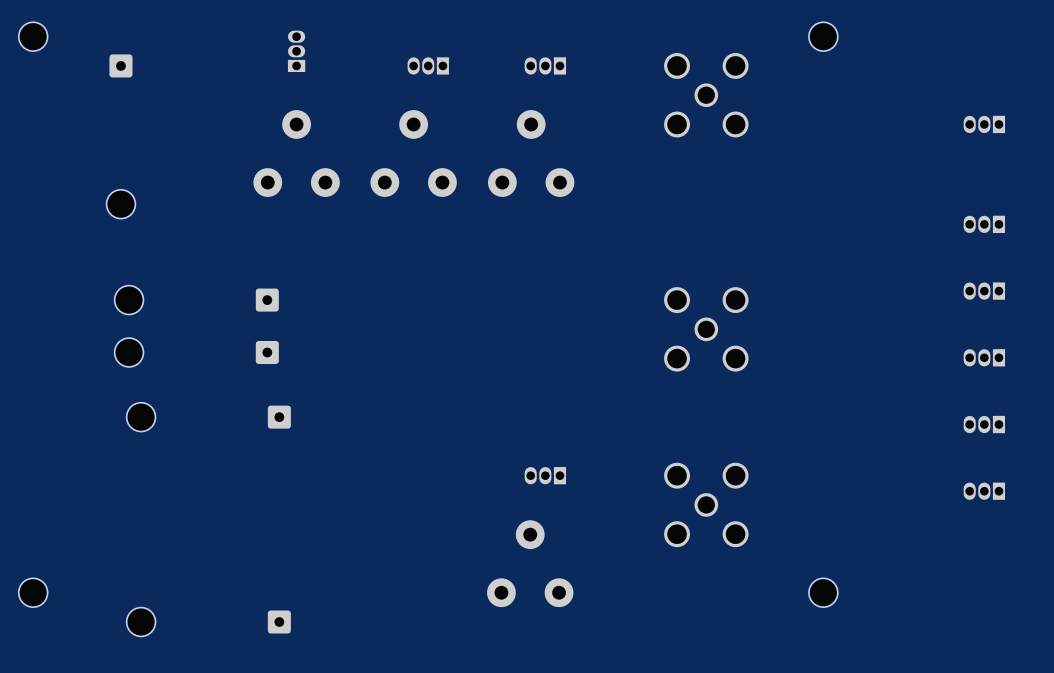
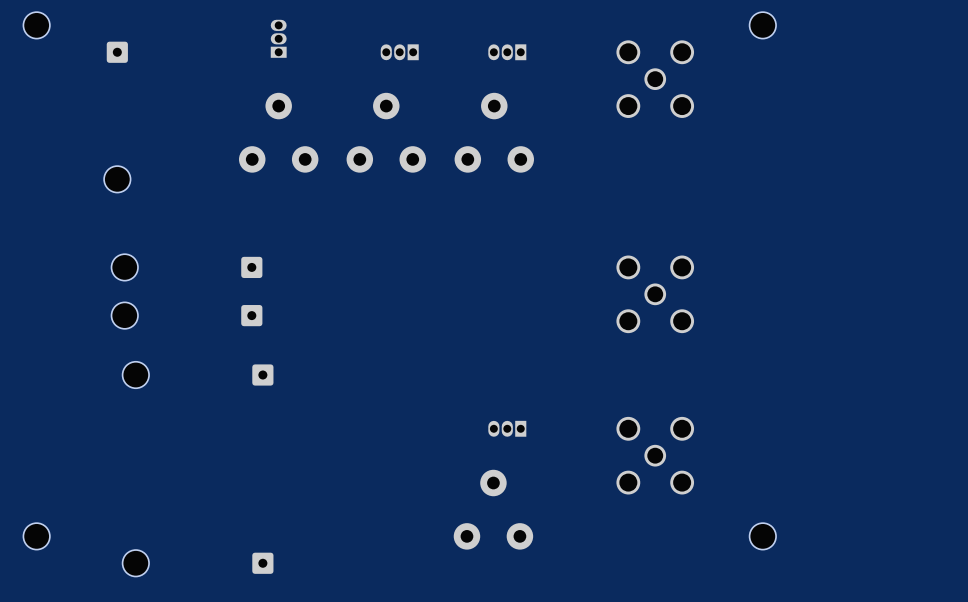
part: (984, 124) -> none
part: (984, 224) -> none
part: (984, 291) -> none
part: (984, 357) -> none
part: (984, 424) -> none
part: (984, 491) -> none

